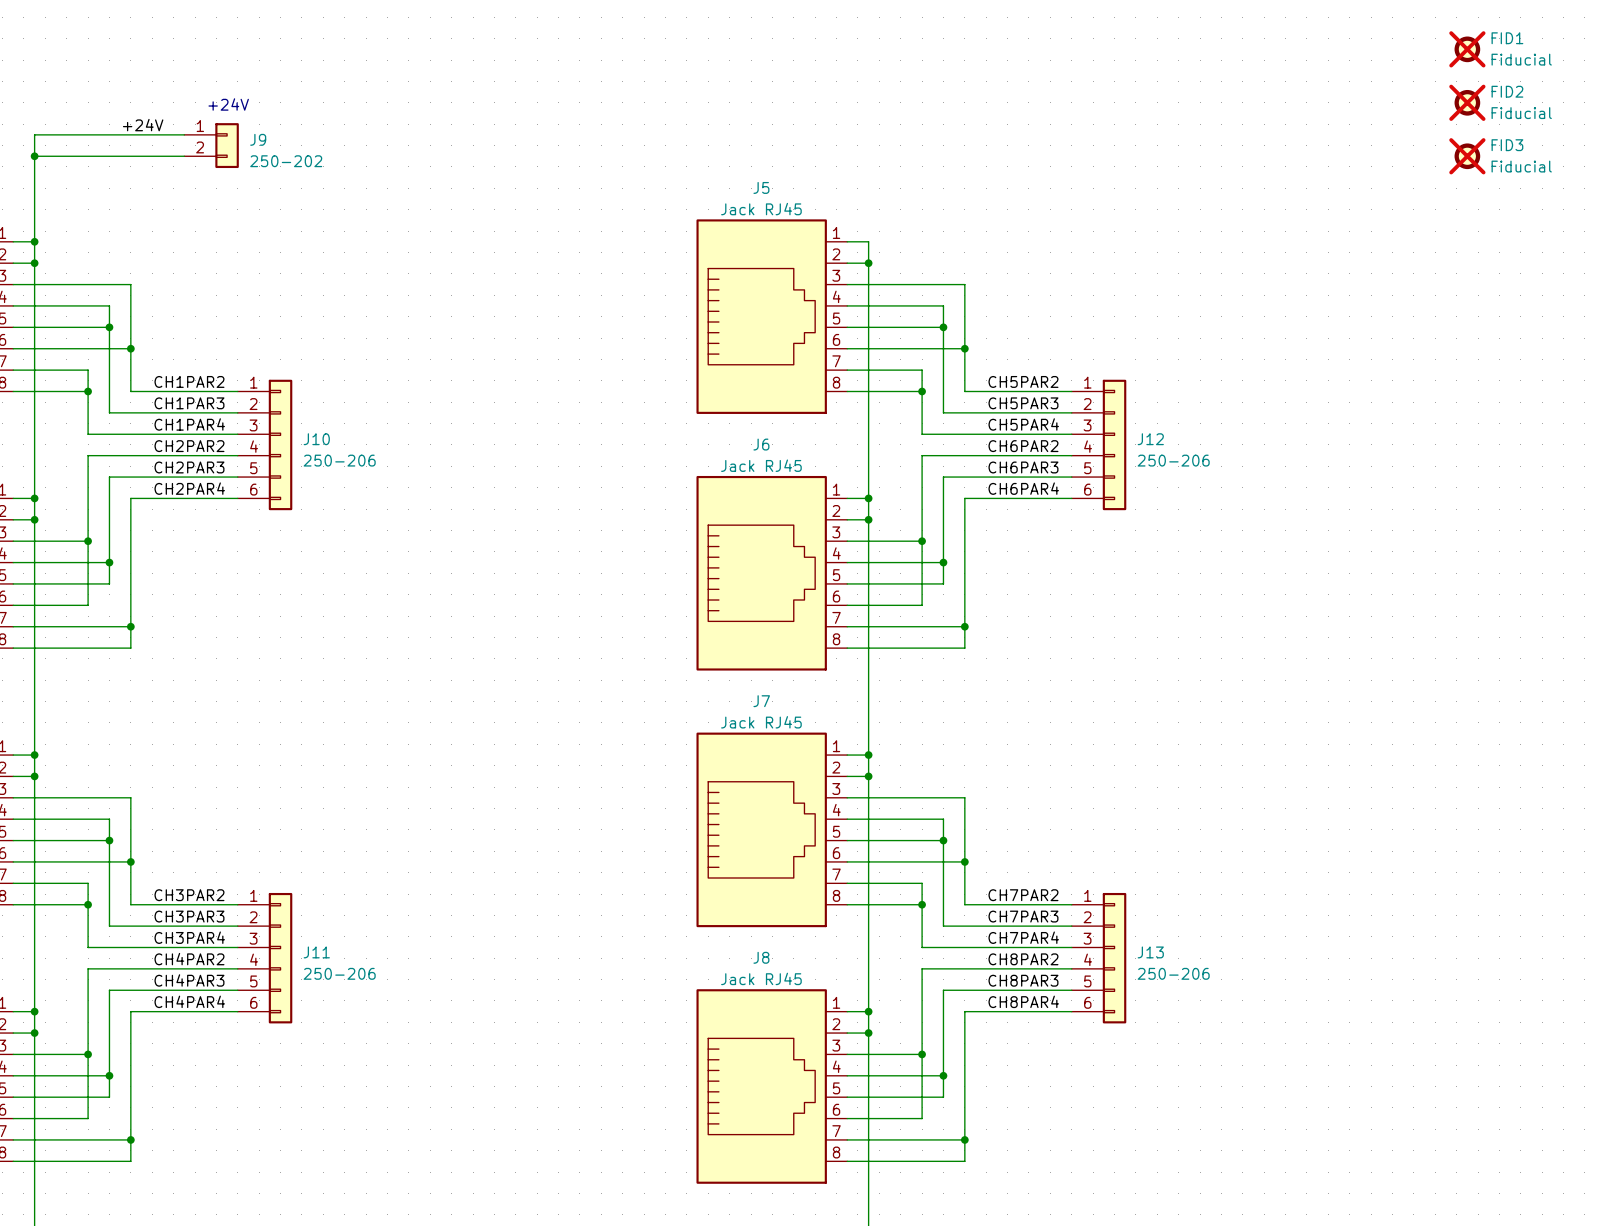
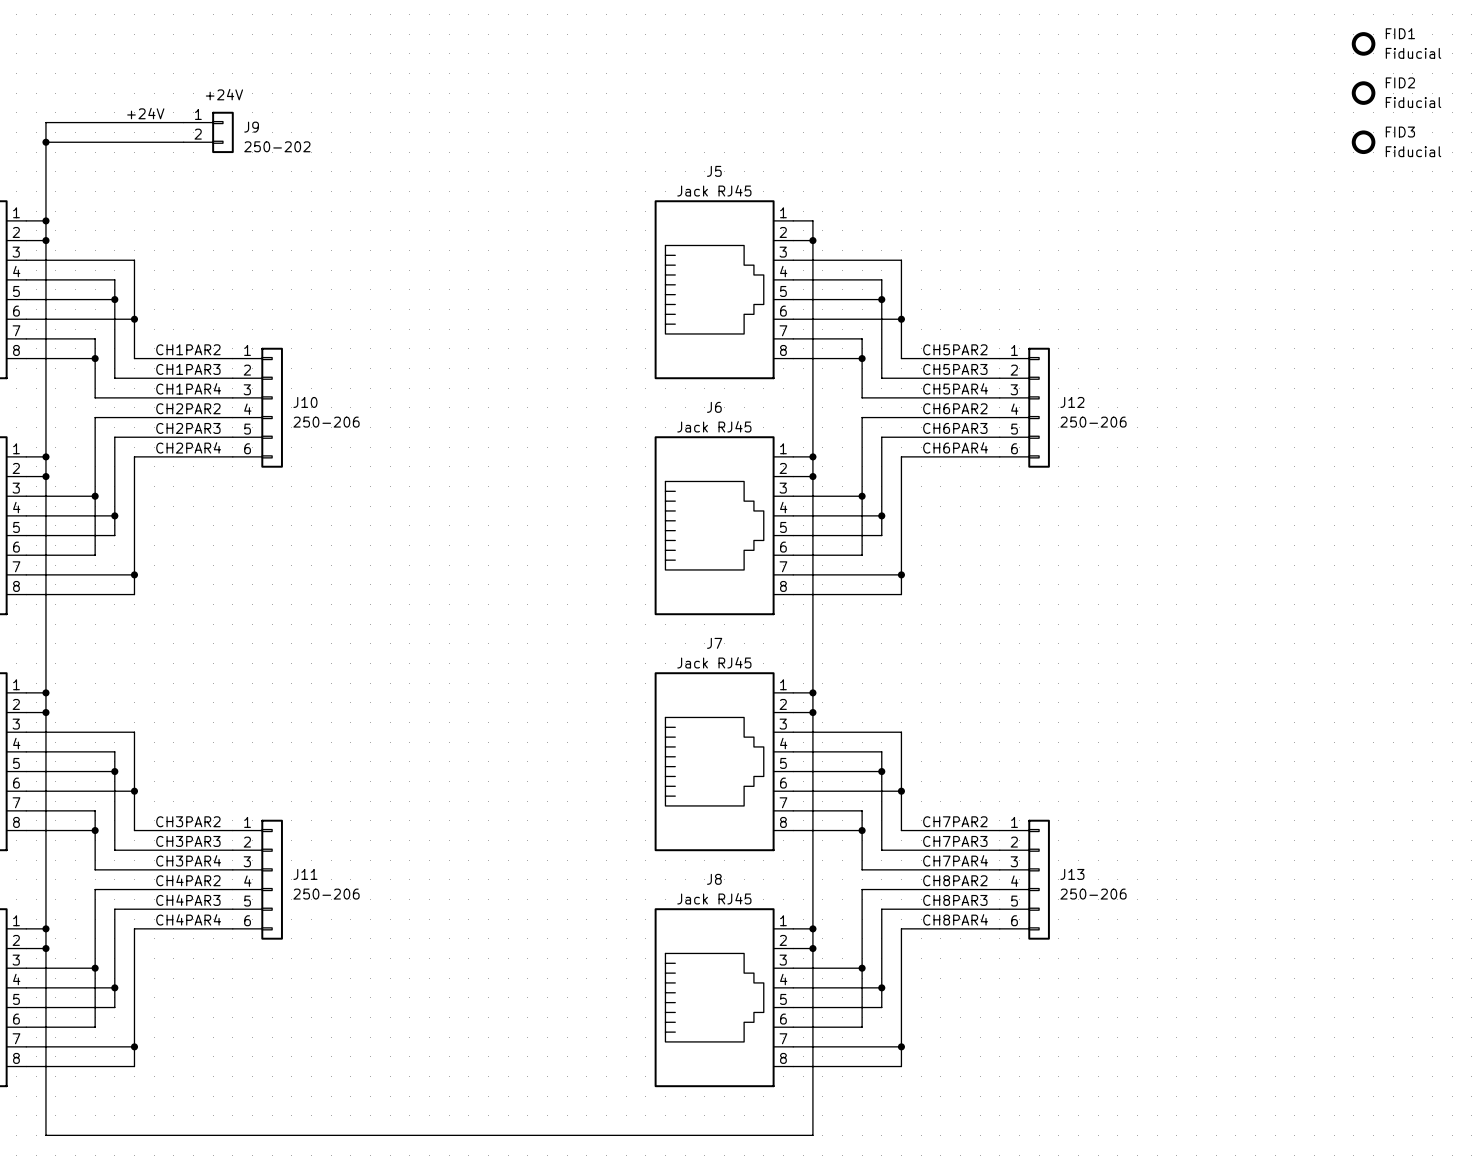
FID1 do-not-place cross: (1467, 49) -> none
FID2 do-not-place cross: (1467, 102) -> none
FID3 do-not-place cross: (1467, 156) -> none

